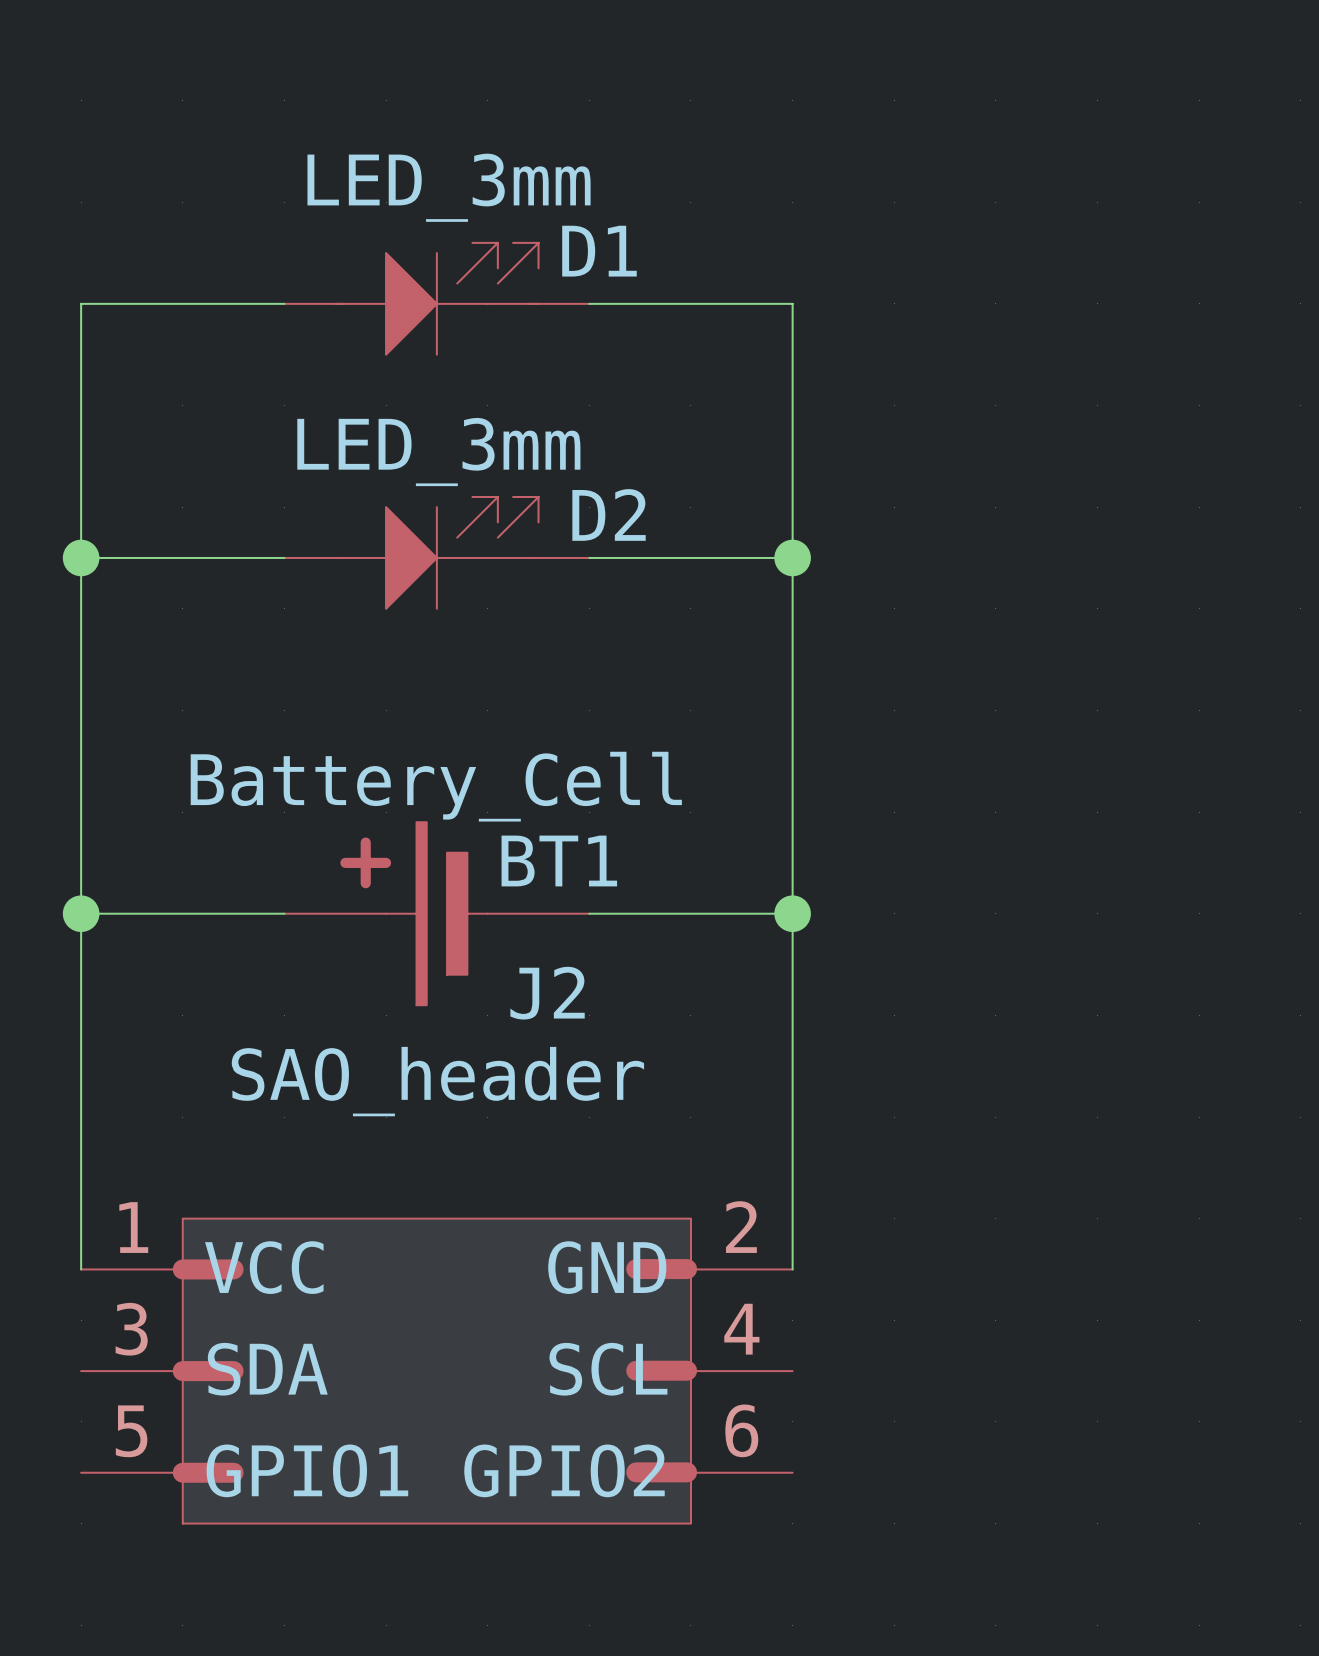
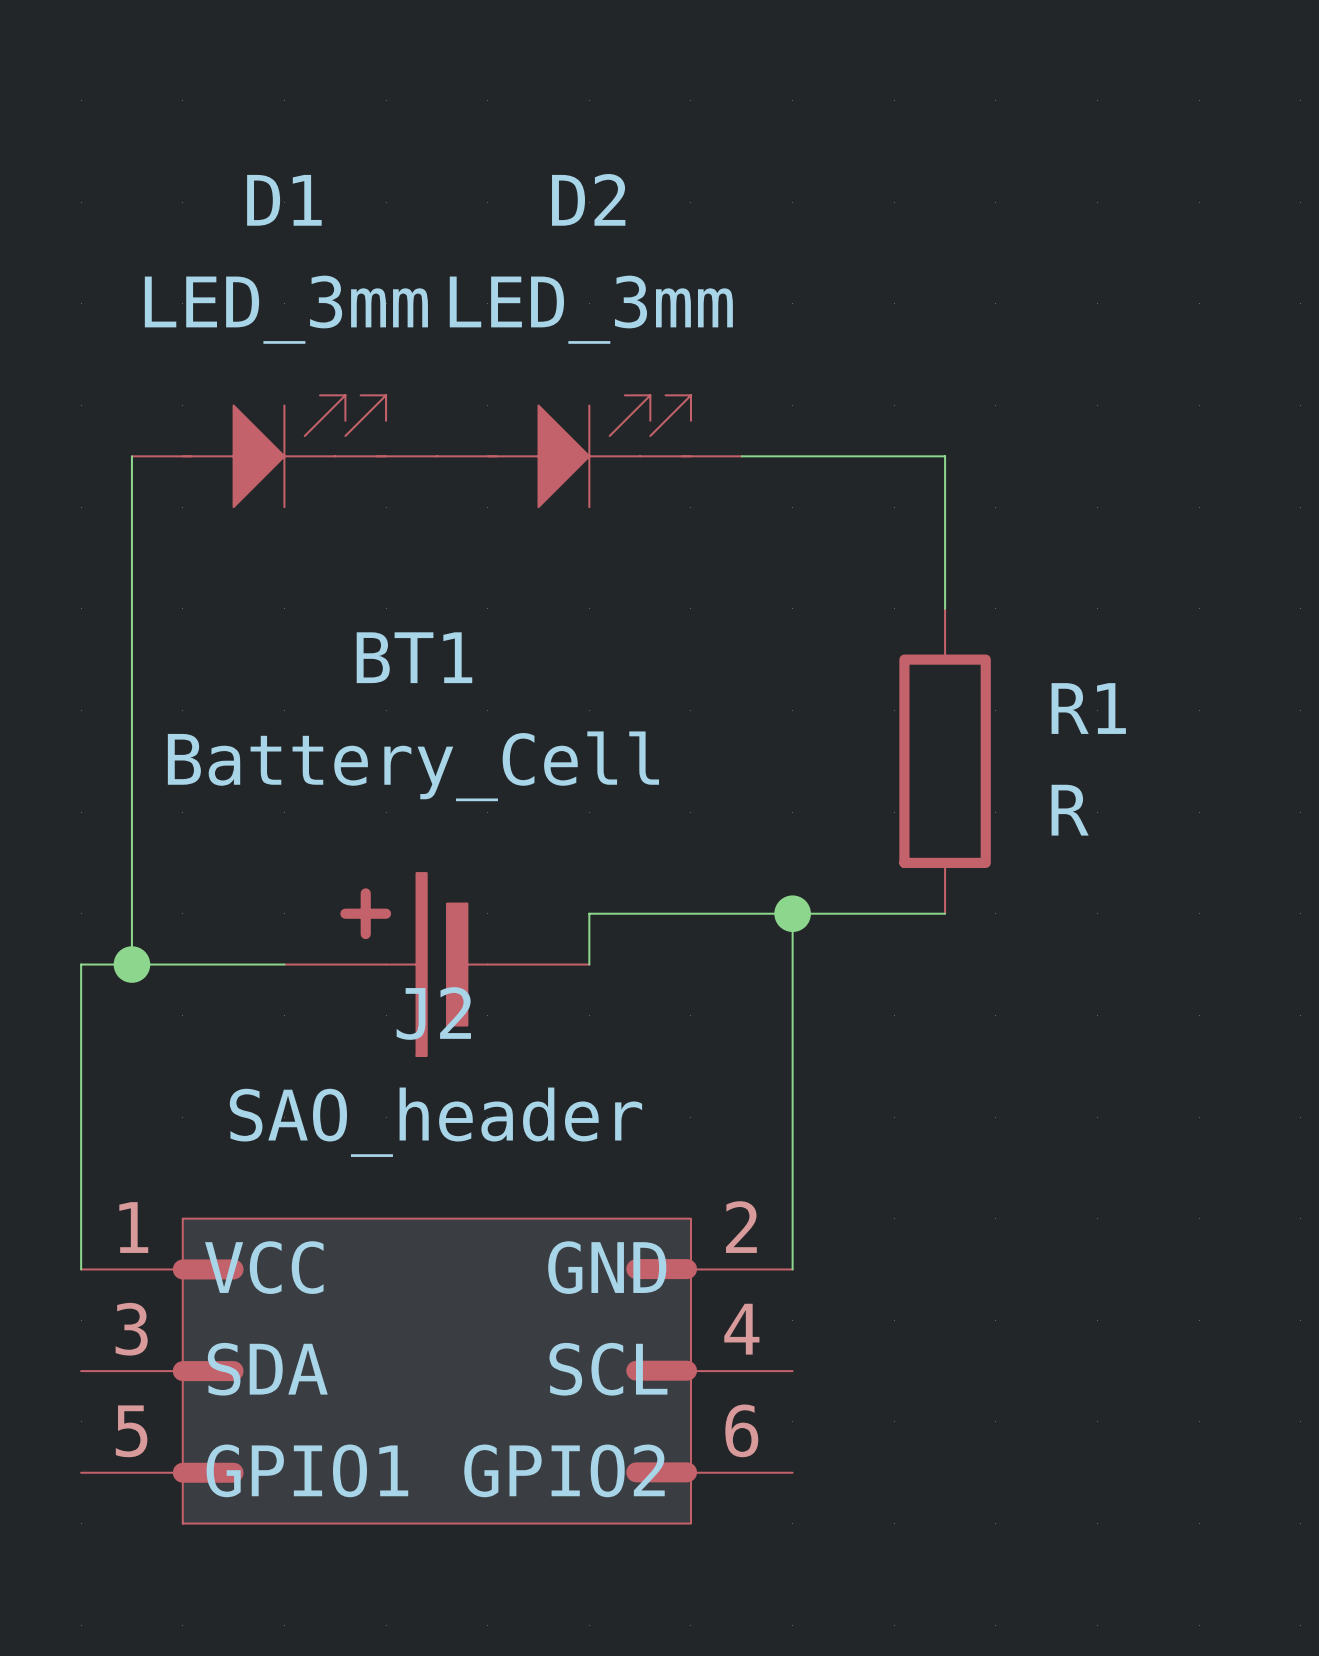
D1 value position: LED_3mm (449, 187) -> LED_3mm (286, 309)
D1 name position: D1 (599, 251) -> D1 (284, 200)
D1 position: (436, 298) -> (284, 451)
wire: (284, 303) (81, 303) (81, 964) -> (284, 964) (81, 964)
wire: (589, 303) (792, 303) (792, 913) -> (945, 913) (792, 913)
D2 value position: LED_3mm (438, 452) -> LED_3mm (591, 309)
wire: none -> (131, 456) (131, 964)
wire: none -> (741, 456) (945, 456) (945, 608)
D2 name position: D2 (609, 514) -> D2 (588, 199)
D2 position: (436, 552) -> (589, 451)
wire: (81, 557) (284, 557) -> none
junction: (81, 557) -> none
wire: (589, 557) (792, 557) -> none
junction: (792, 557) -> none
R1: none -> R (945, 761)
BT1 value position: Battery_Cell (436, 786) -> Battery_Cell (413, 766)
BT1 name position: BT1 (559, 860) -> BT1 (414, 657)
wire: (81, 913) (284, 913) -> none
junction position: (81, 913) -> (131, 964)
BT1 position: (436, 913) -> (436, 964)
wire: none -> (589, 913) (589, 964)
J2 name position: J2 (547, 993) -> J2 (433, 1013)
J2 value position: SAO_header (437, 1081) -> SAO_header (435, 1122)

